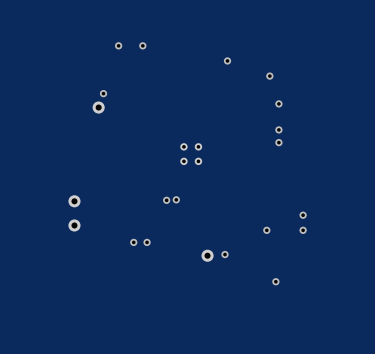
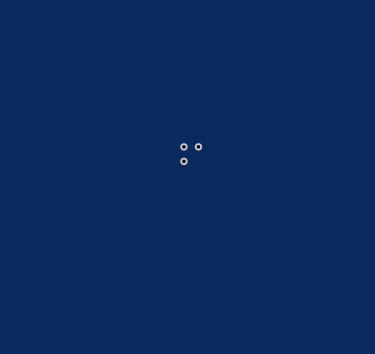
via: (118, 45) -> none
via: (142, 45) -> none
via: (227, 60) -> none
via: (269, 76) -> none
via: (103, 93) -> none
via: (278, 103) -> none
part: (98, 107) -> none
via: (278, 129) -> none
via: (278, 142) -> none
part footprint: [180, 143, 203, 166] -> [180, 143, 203, 166]
via: (176, 199) -> none
via: (166, 200) -> none
part: (74, 201) -> none
via: (303, 215) -> none
part: (74, 225) -> none
via: (266, 230) -> none
via: (303, 230) -> none
via: (133, 242) -> none
via: (147, 242) -> none
via: (224, 254) -> none
part: (207, 255) -> none
via: (275, 281) -> none

